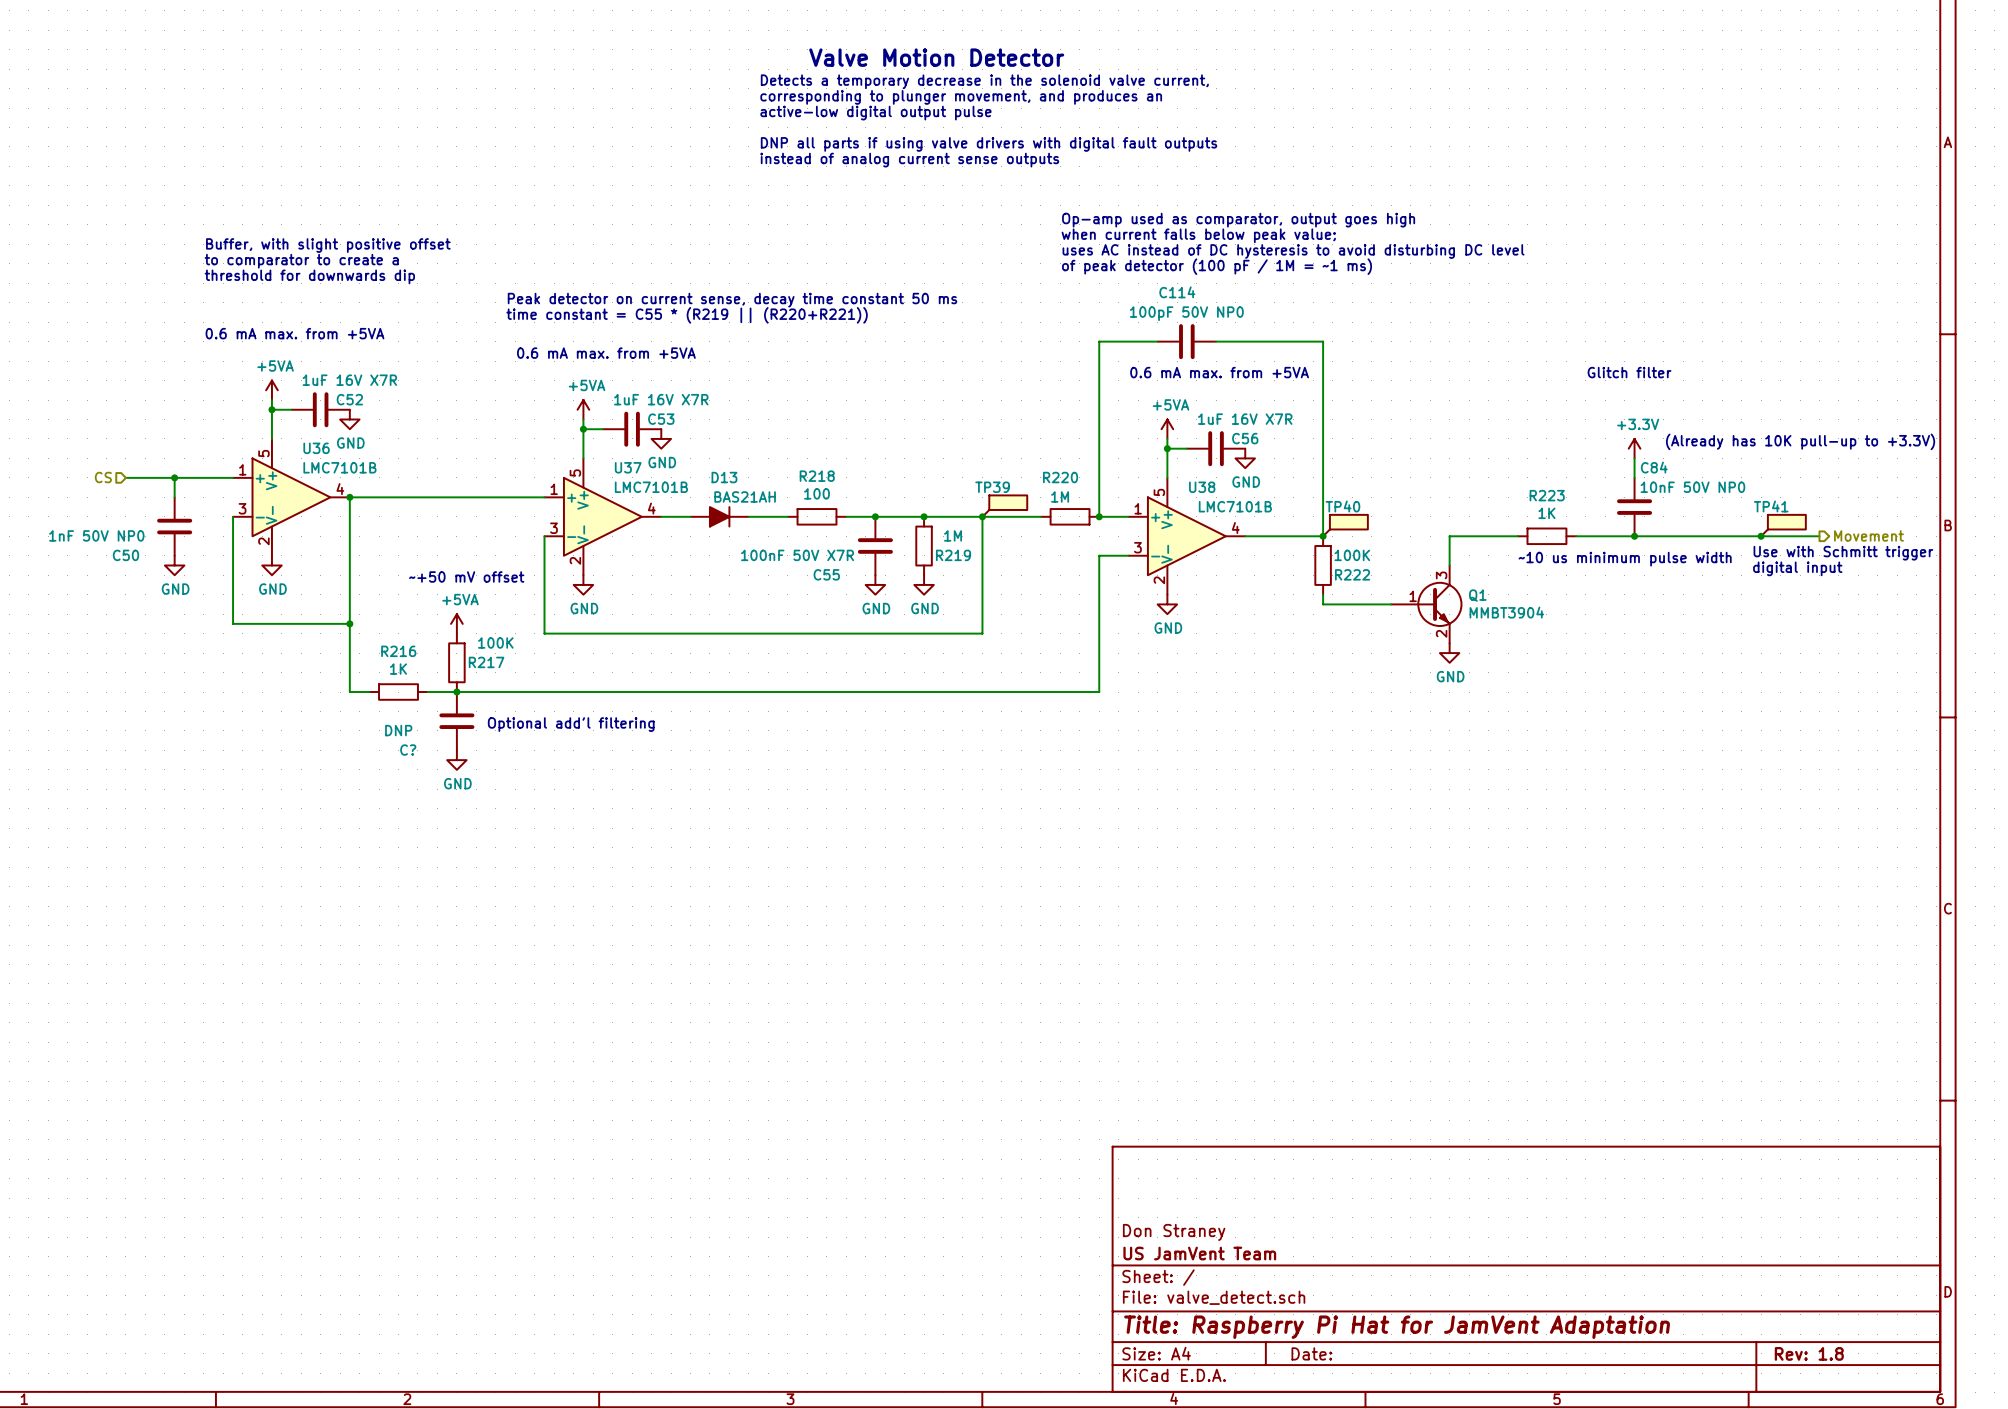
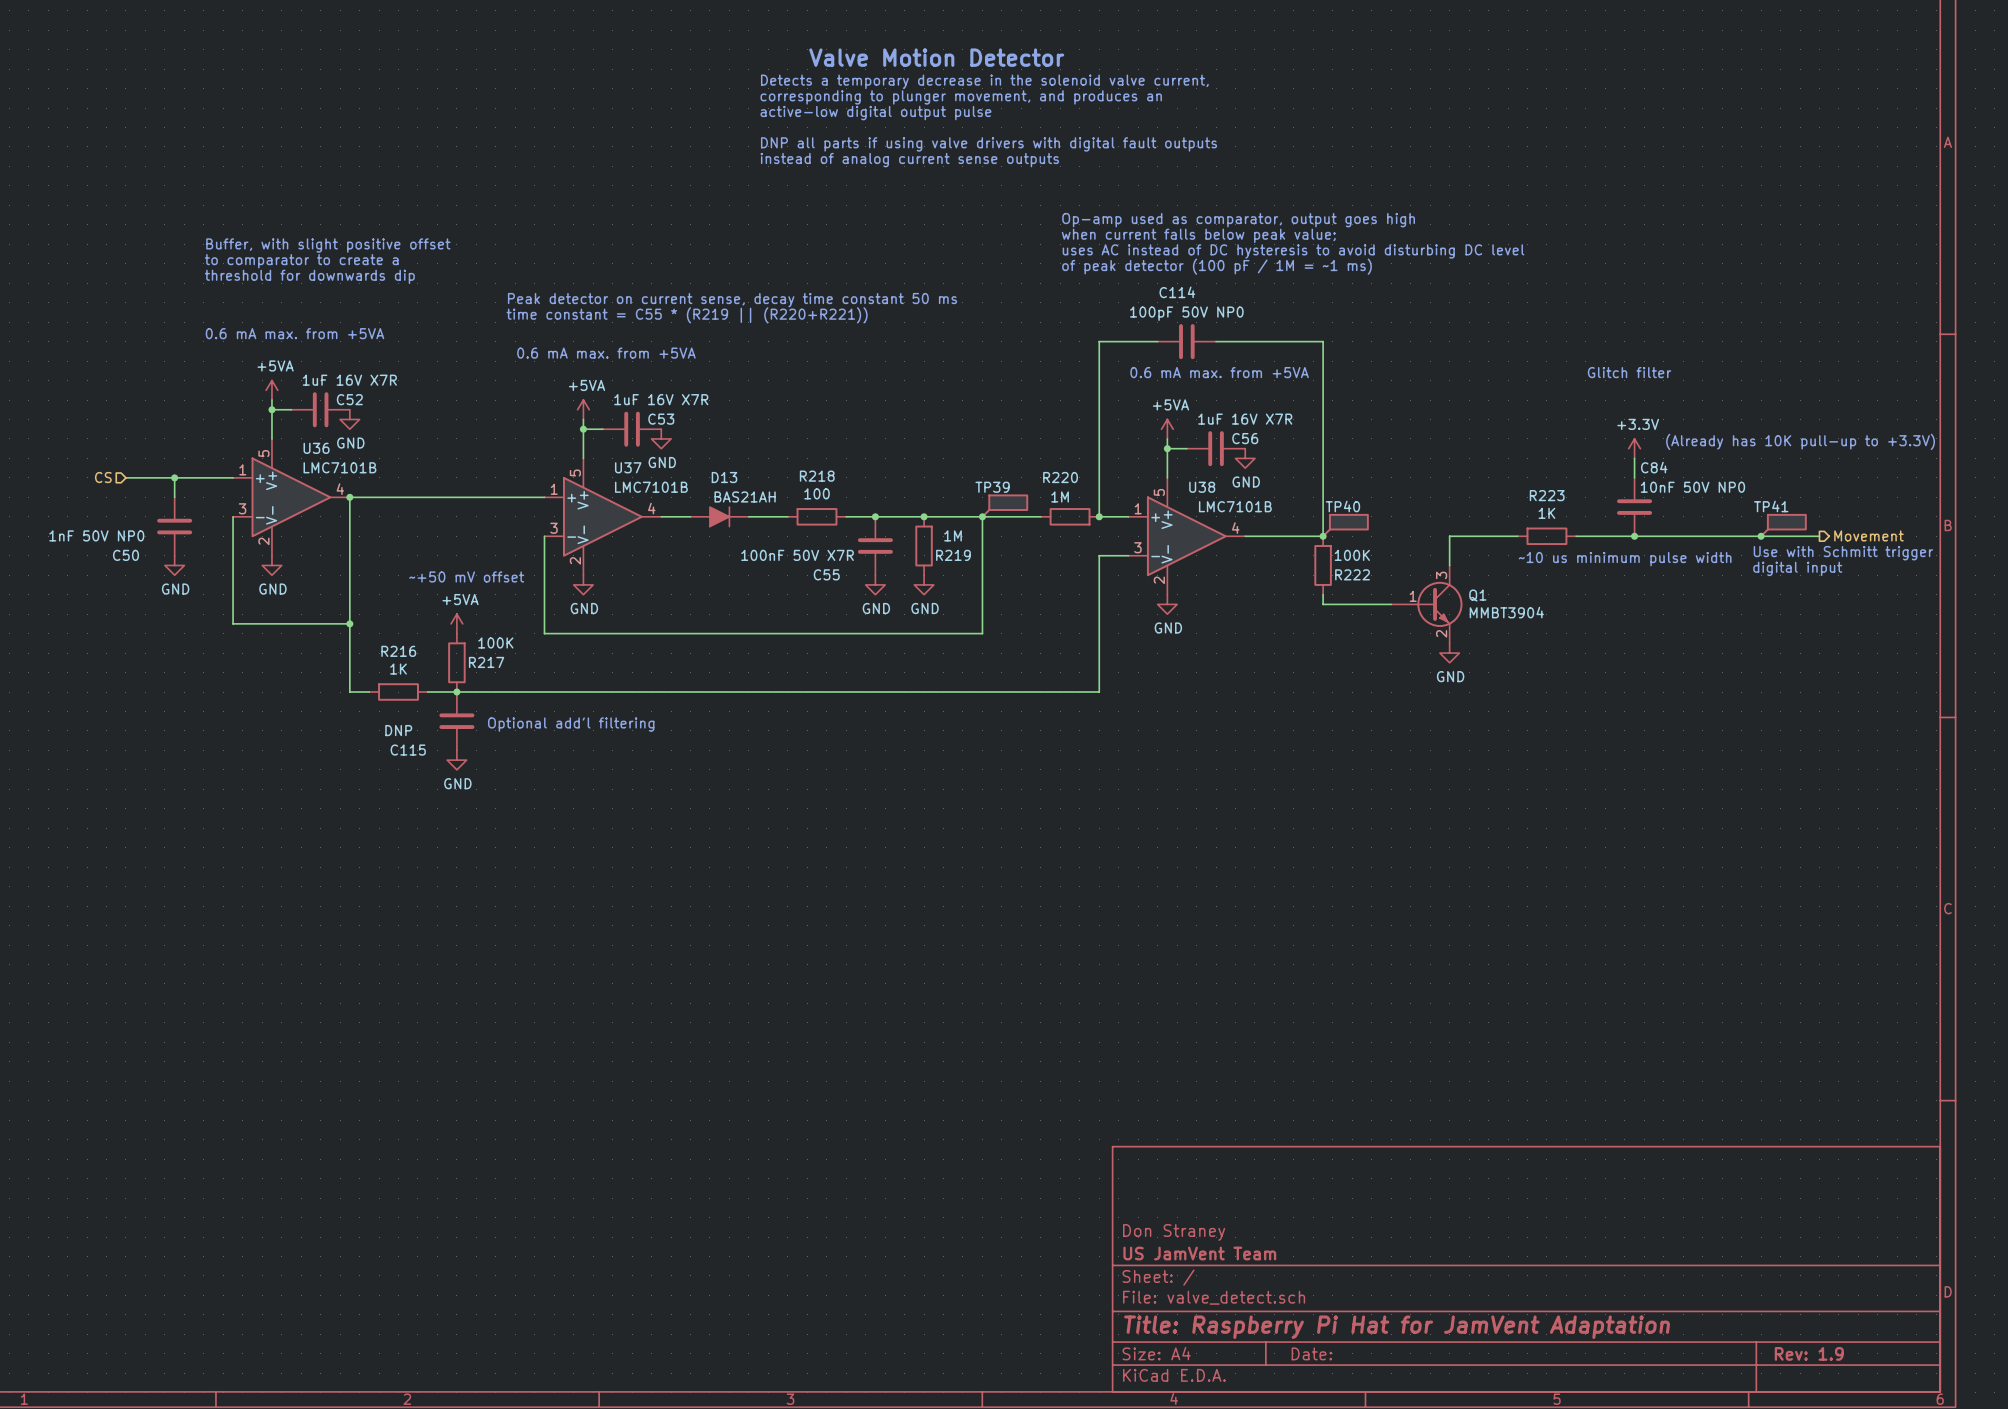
C? name: C? (408, 750) -> C115 (408, 750)
title block: Rev: 1.8 (1809, 1353) -> Rev: 1.9 (1809, 1353)

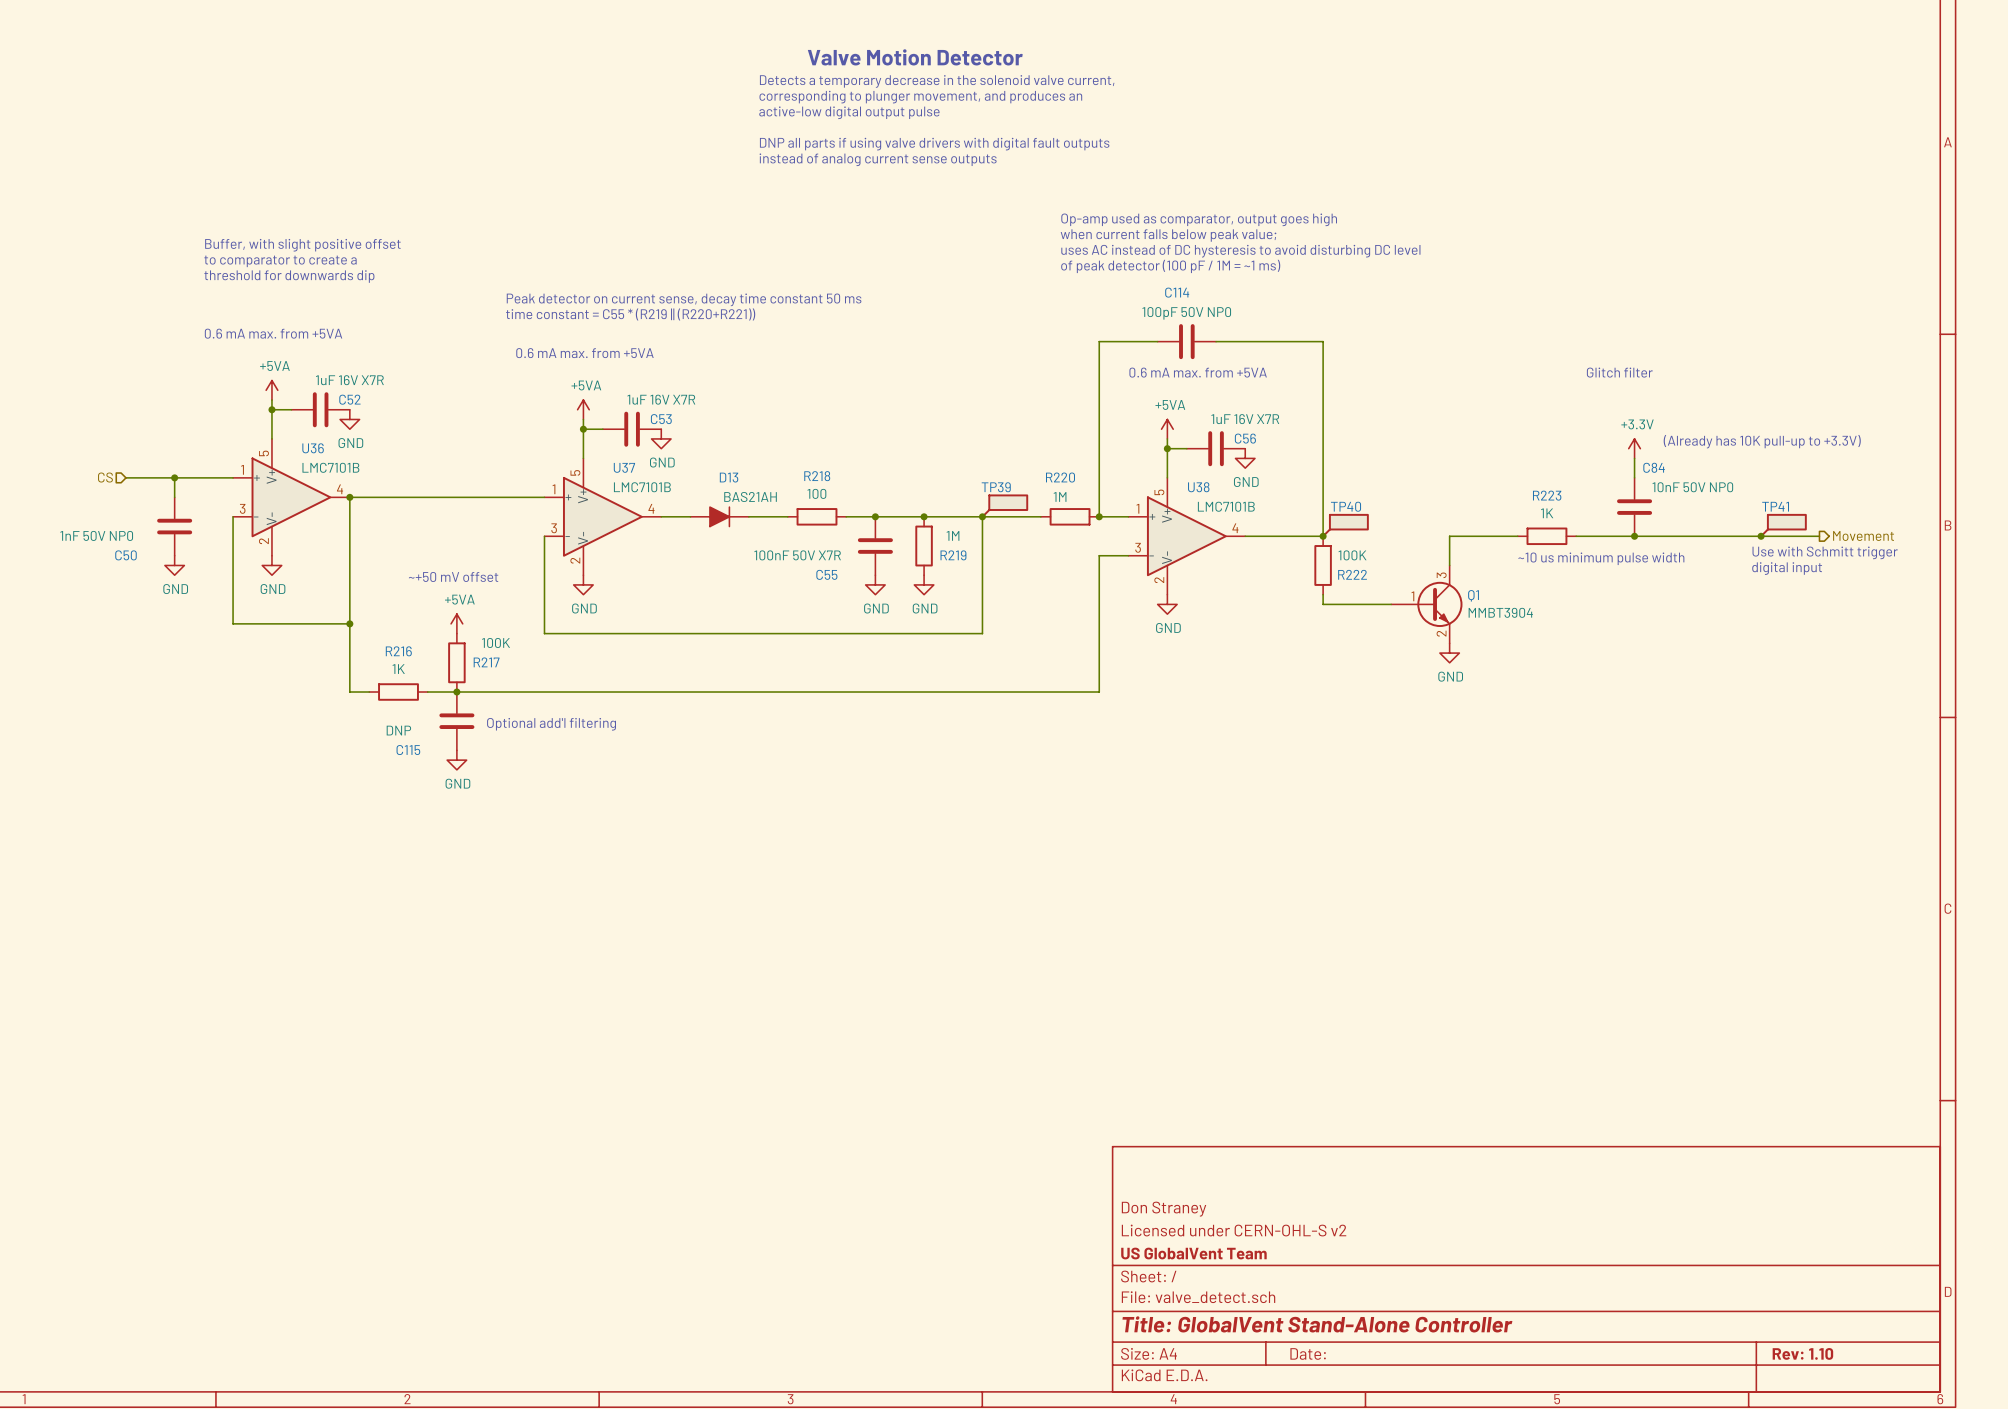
title block: none -> Don Straney (1164, 1209)
title block: Don Straney (1174, 1232) -> Licensed under CERN-OHL-S v2 (1234, 1230)
title block: US JamVent Team (1199, 1253) -> US GlobalVent Team (1193, 1253)
title block: Title: Raspberry Pi Hat for JamVent Adaptation (1397, 1327) -> Title: GlobalVent Stand-Alone Controller (1317, 1324)
title block: Rev: 1.9 (1809, 1353) -> Rev: 1.10 (1802, 1353)

